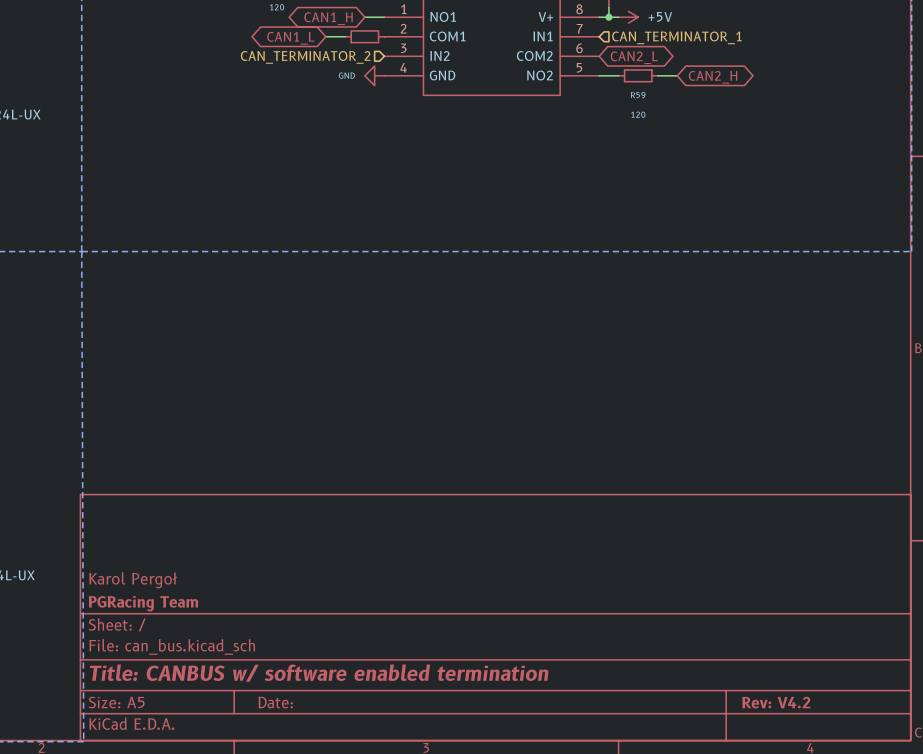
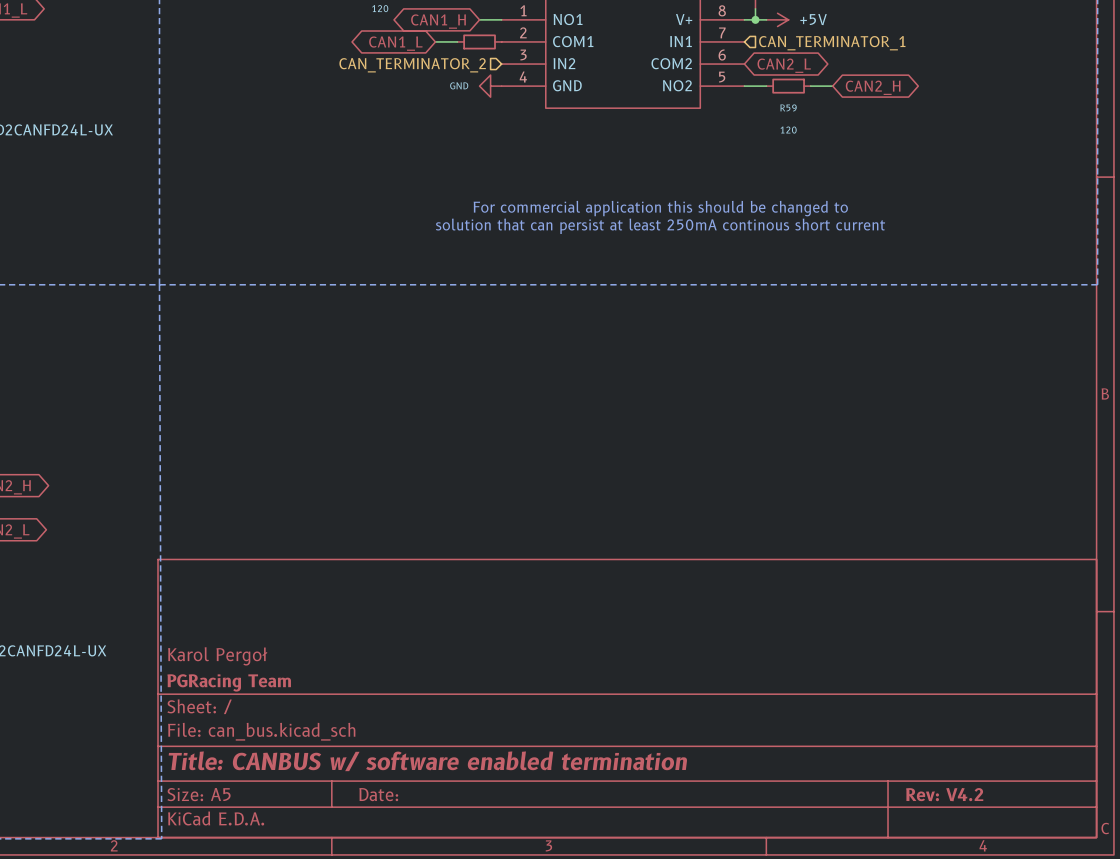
text: none -> For commercial application this should be changed to (660, 208)
text: none -> solution that can persist at least 250mA continous short current (660, 226)

